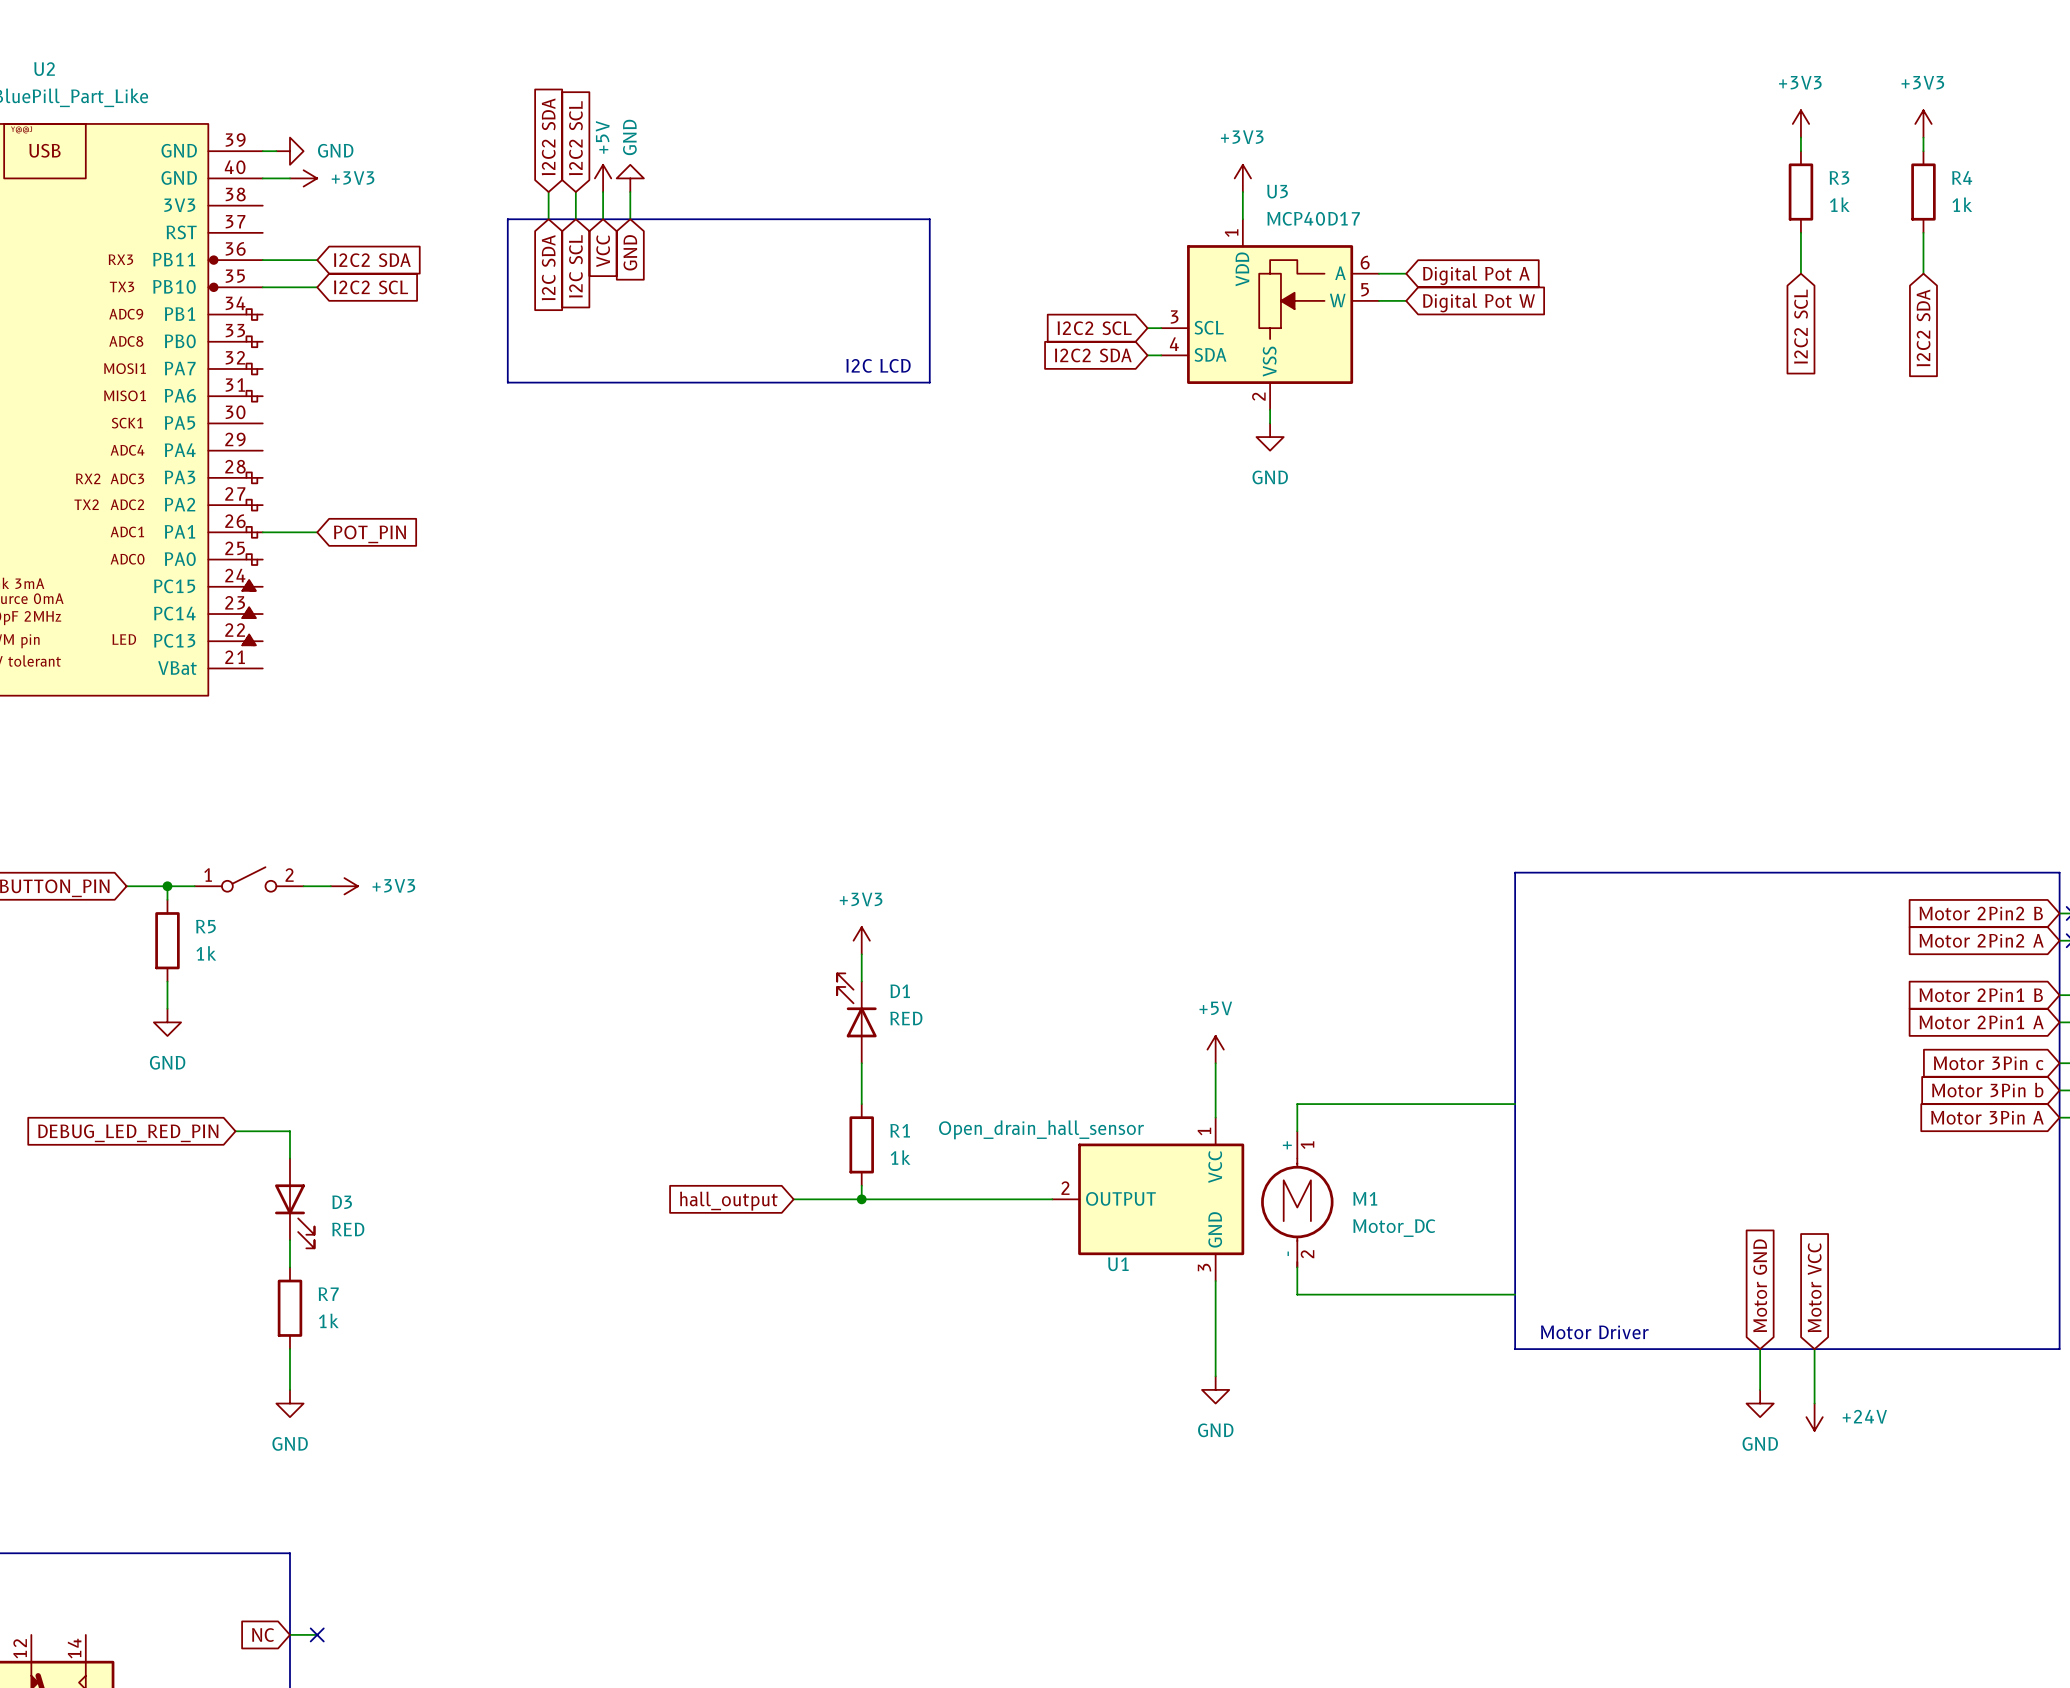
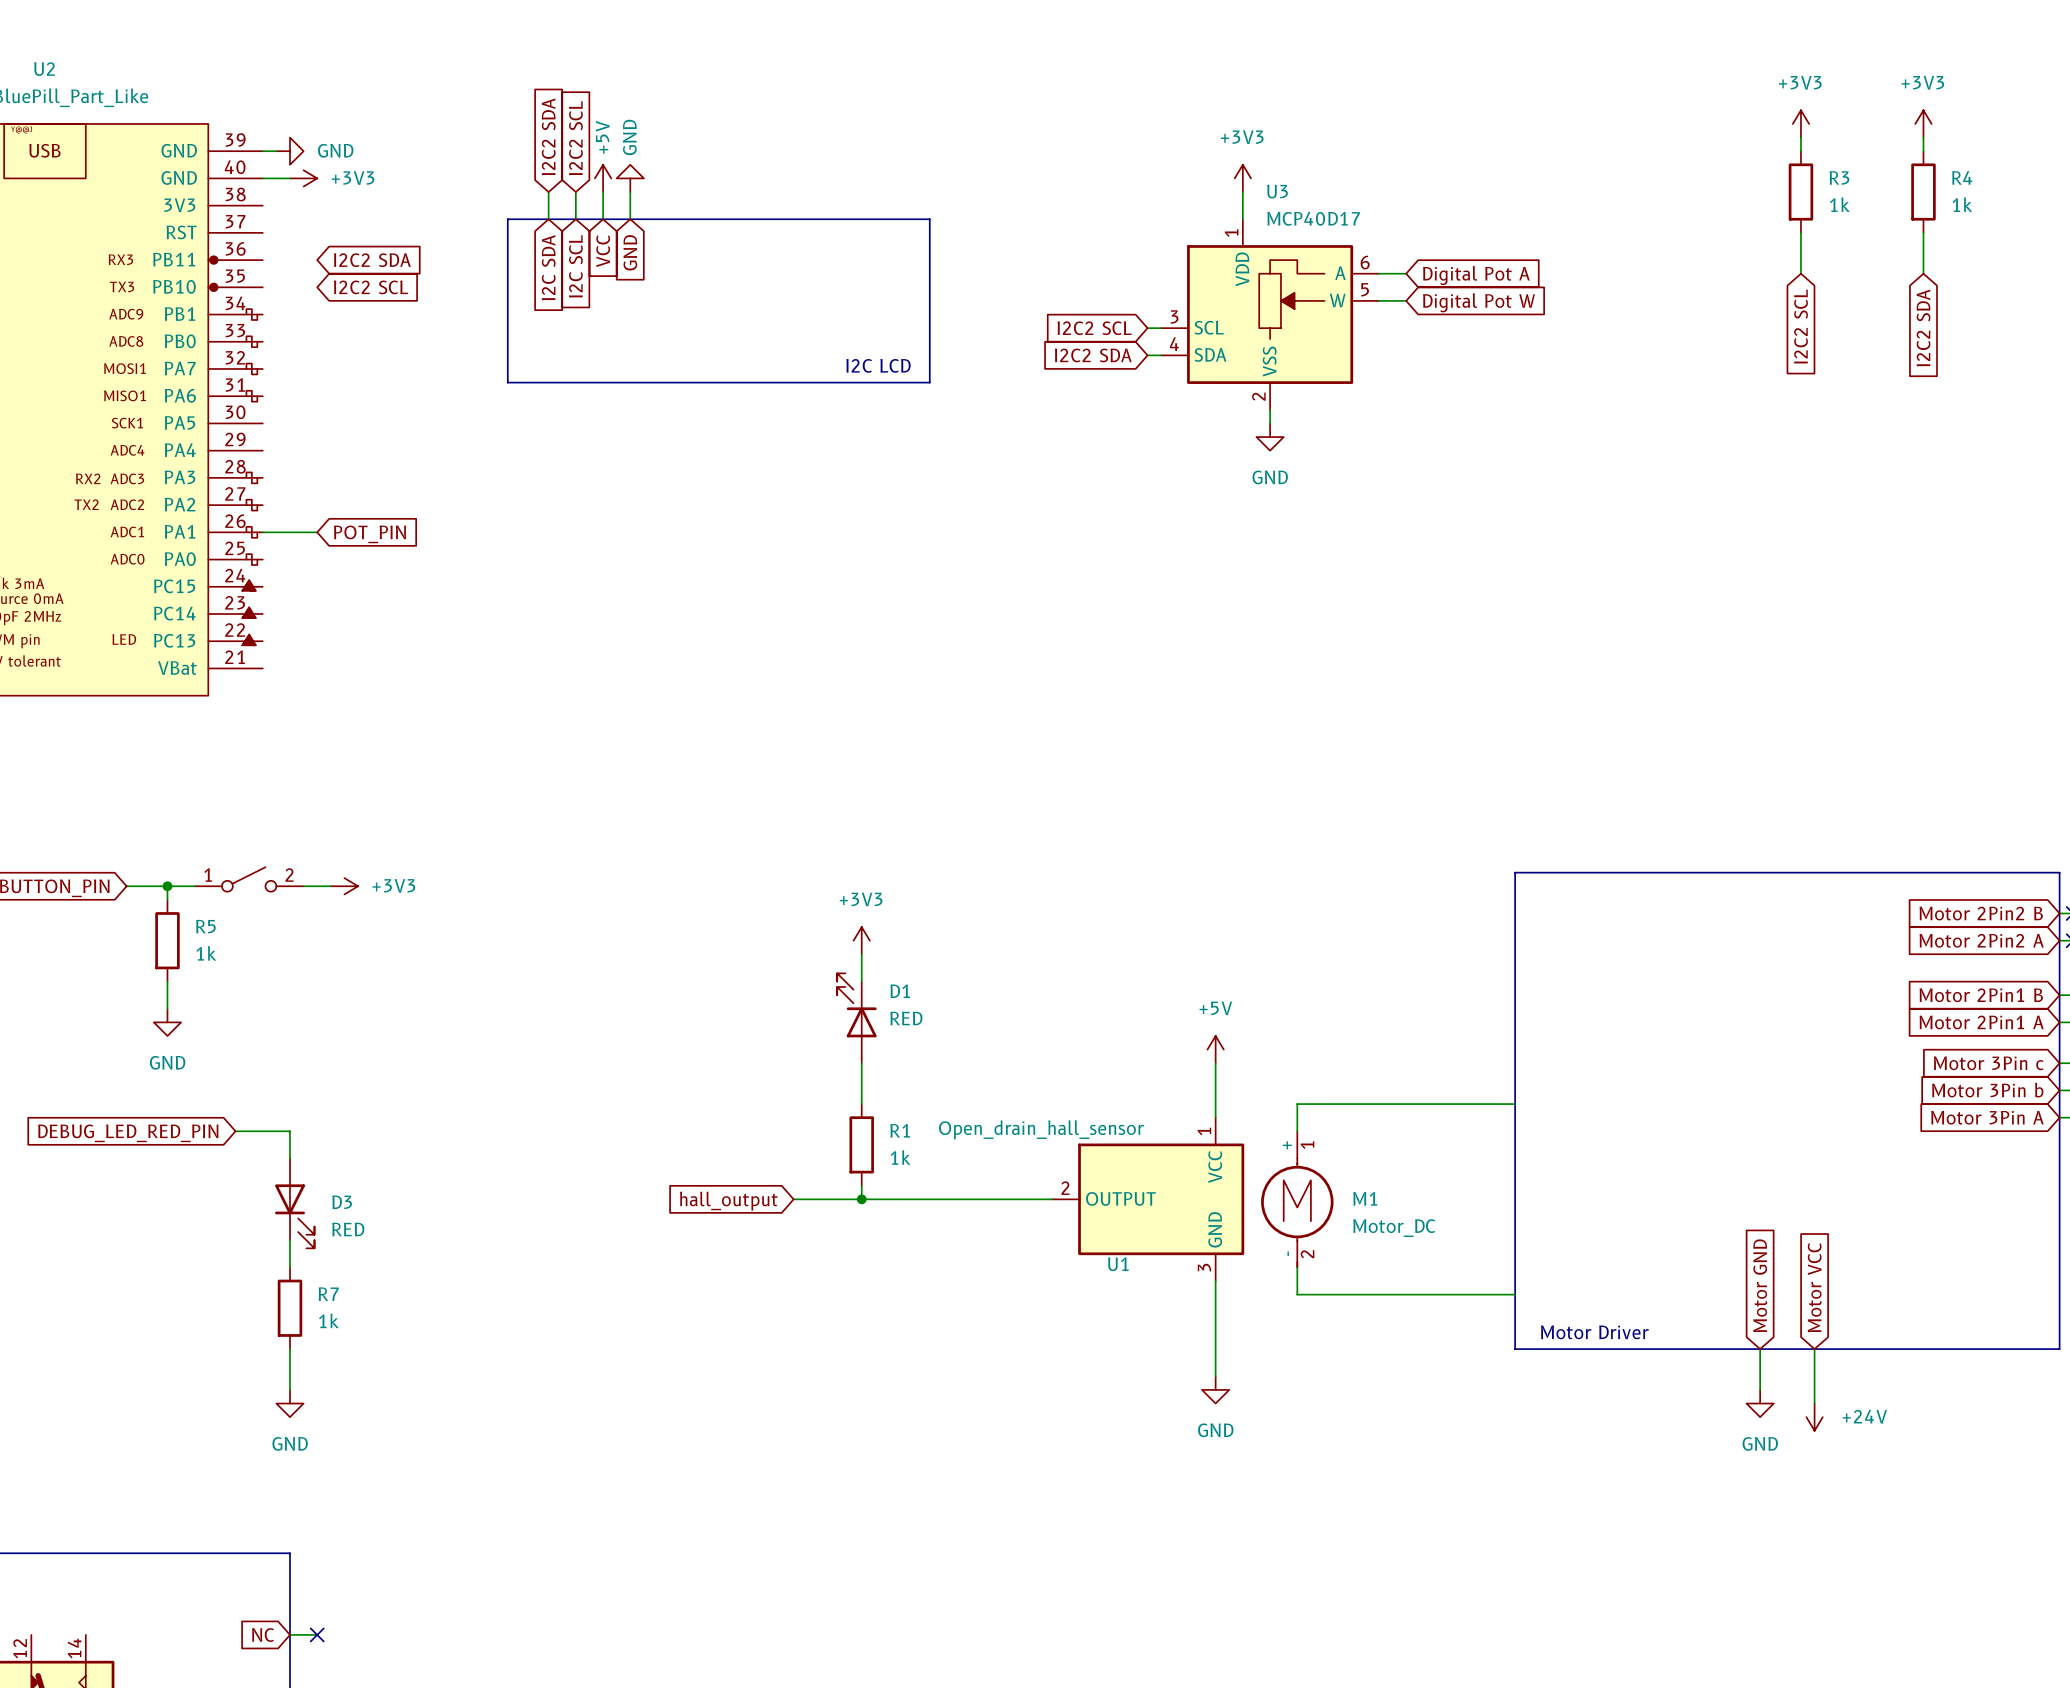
wire: (262, 260) (317, 260) -> none
wire: (262, 287) (317, 287) -> none

